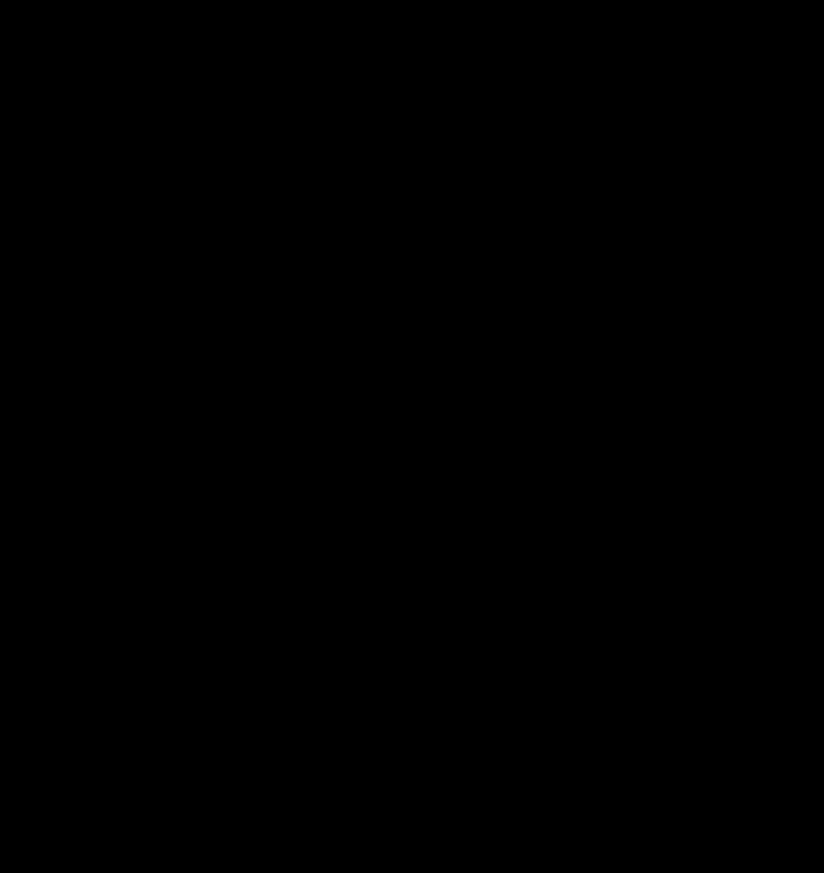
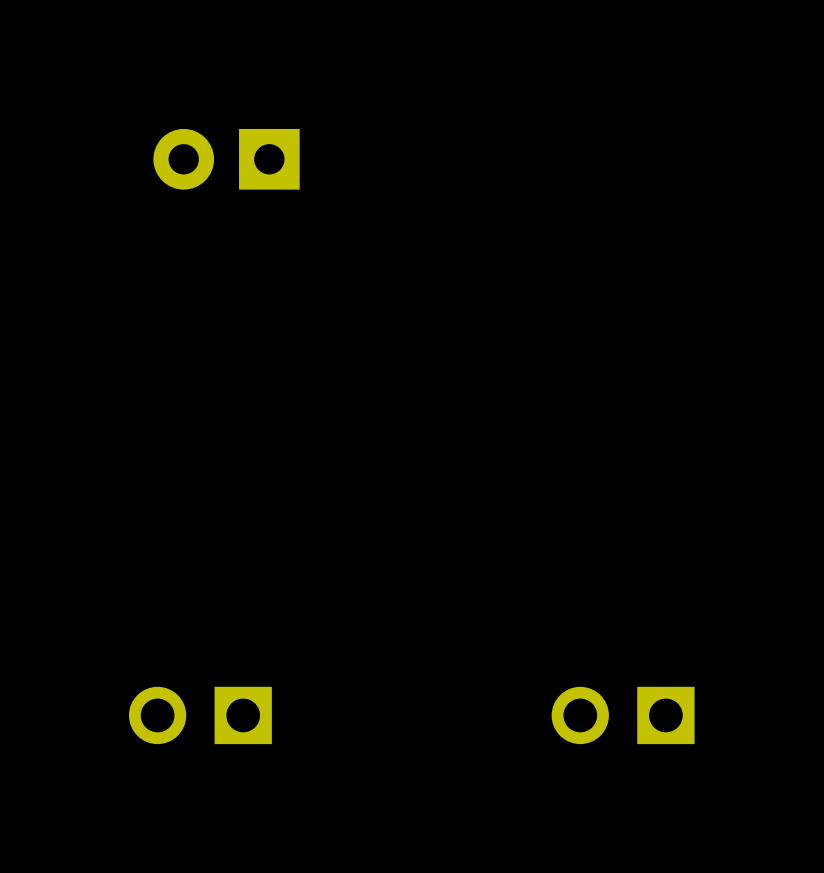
part: none -> (226, 159)
part: none -> (200, 715)
part: none -> (623, 715)

